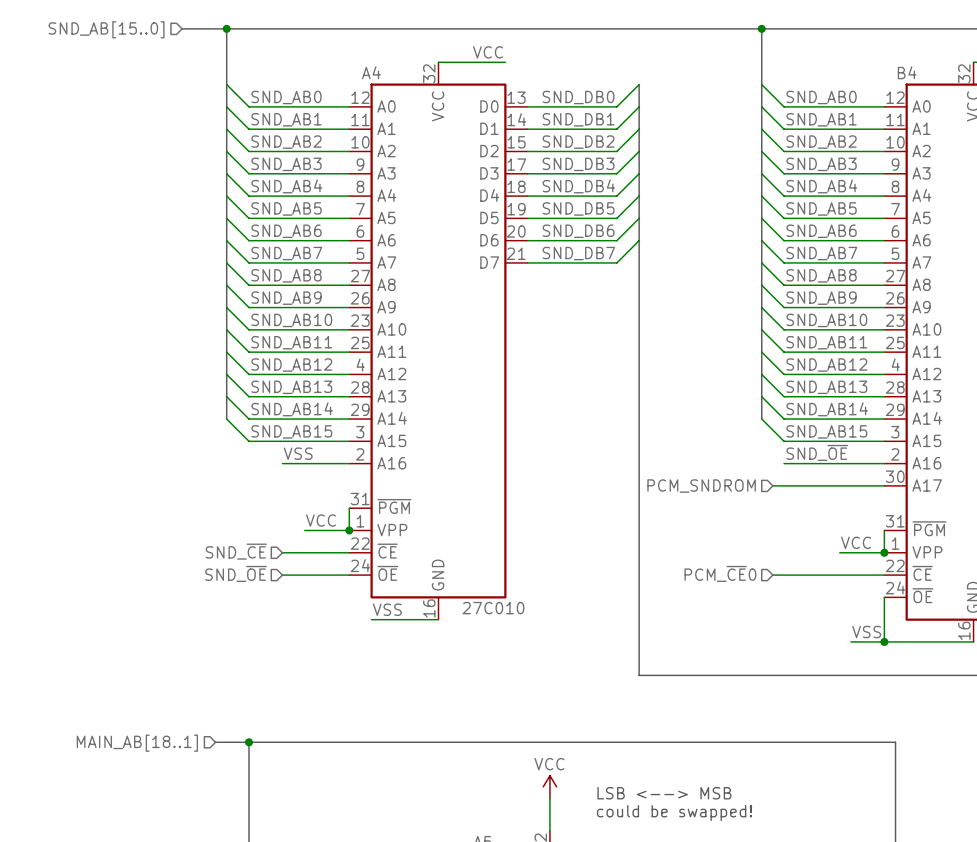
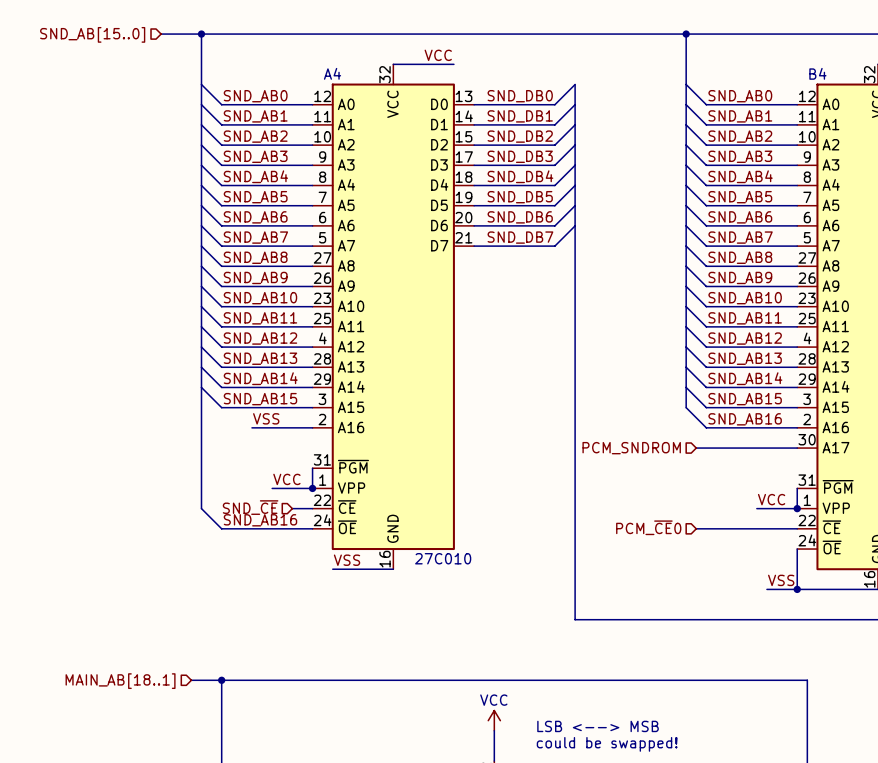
bus: none -> (201, 387) (201, 508)
bus: none -> (686, 387) (686, 407)
wire: none -> (686, 407) (706, 427)
label: SND_~{OE} (817, 452) -> SND_AB16 (745, 419)
hierarchical label position: SND_~{CE} (236, 551) -> SND_~{CE} (250, 507)
wire: none -> (201, 508) (221, 528) (251, 528)
wire: (282, 552) (327, 552) -> none
label: none -> SND_AB16 (260, 520)
hierarchical label: SND_~{OE} (236, 573) -> none

